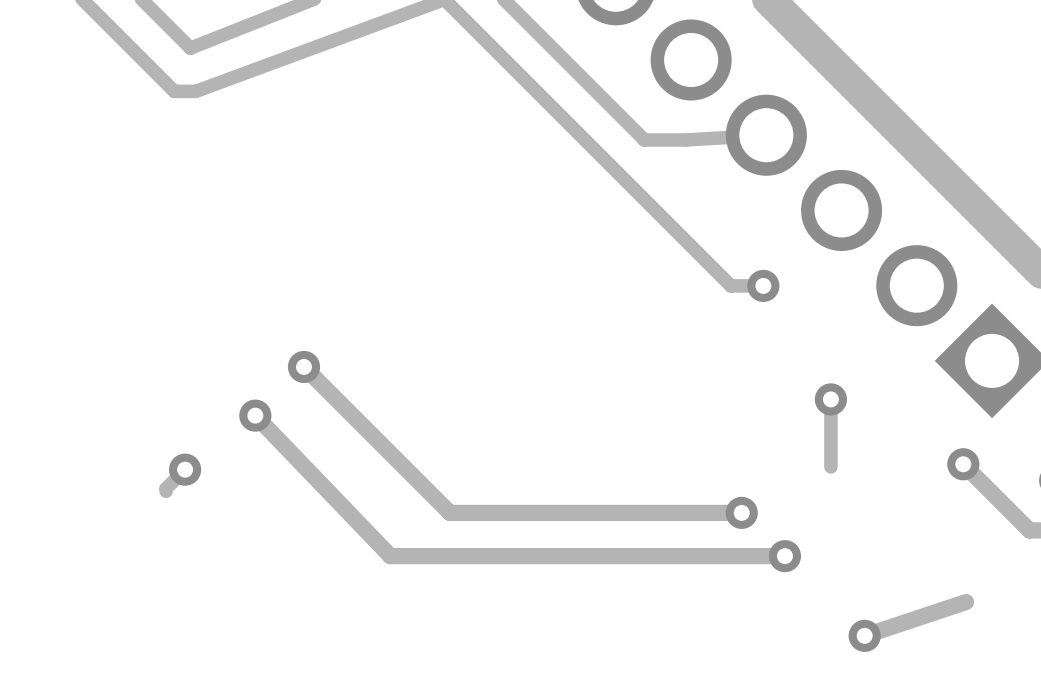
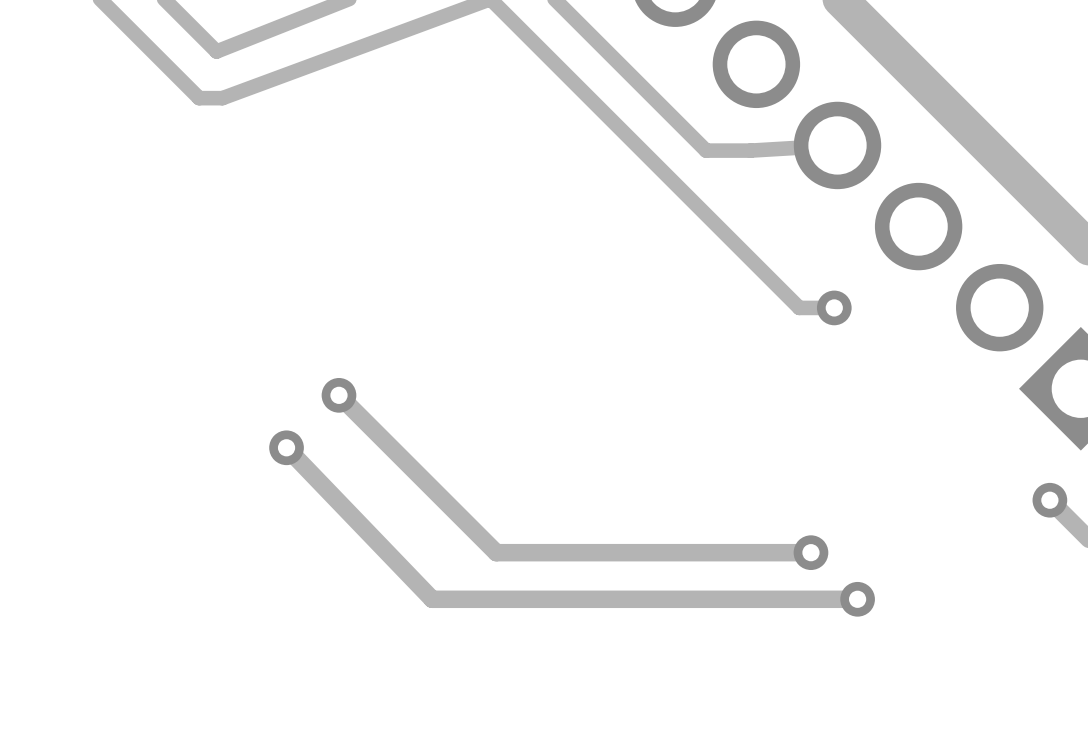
track: (830, 399) (830, 466) -> none
via: (830, 399) -> none
track: (185, 469) (166, 488) (166, 491) -> none
via: (185, 469) -> none
track: (966, 602) (864, 635) -> none
via: (864, 635) -> none

